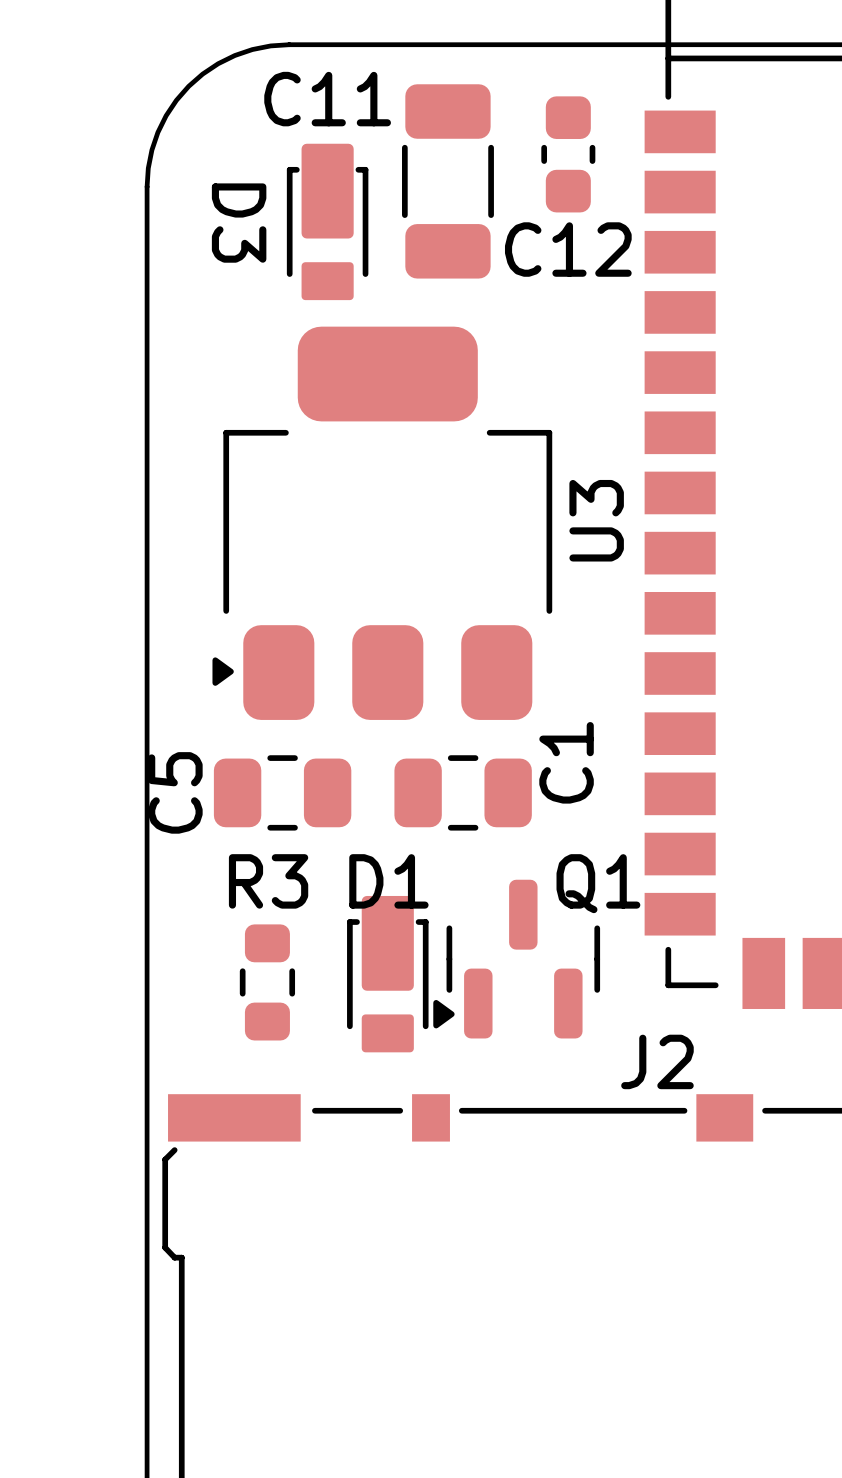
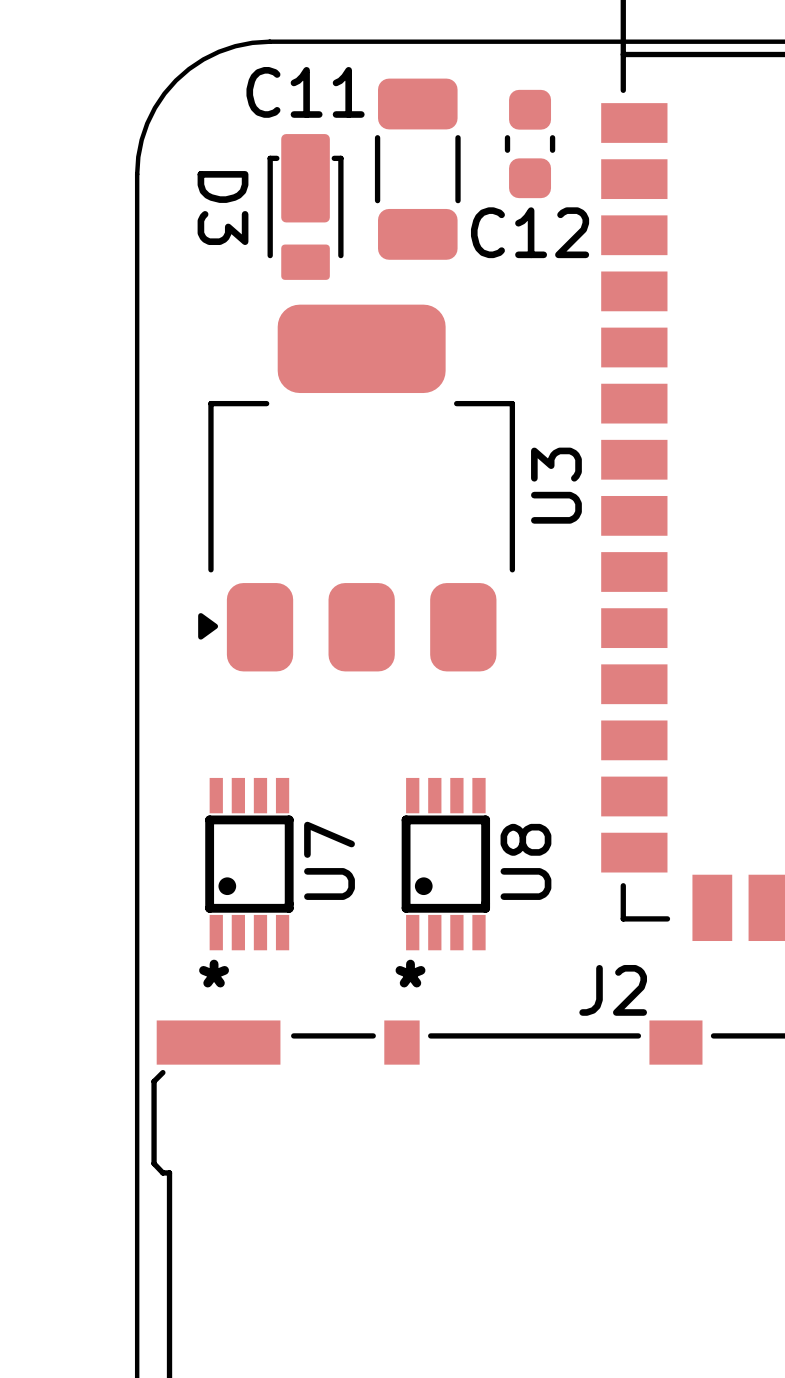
C5: (282, 792) -> none
C1: (463, 792) -> none
part: none -> U7 (249, 864)
part: none -> U8 (445, 864)
Q1: (516, 959) -> none
D1: (387, 974) -> none
R3: (267, 982) -> none

